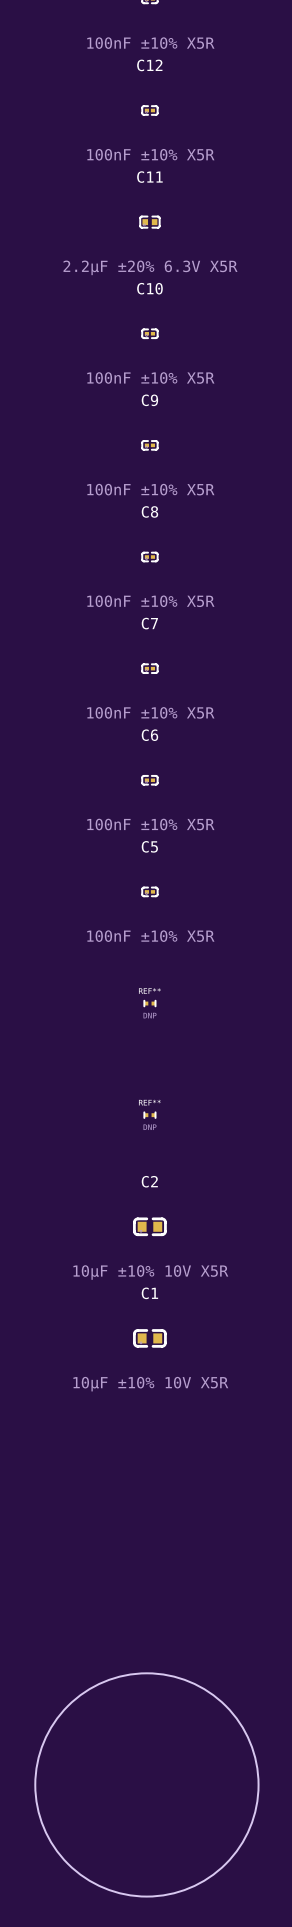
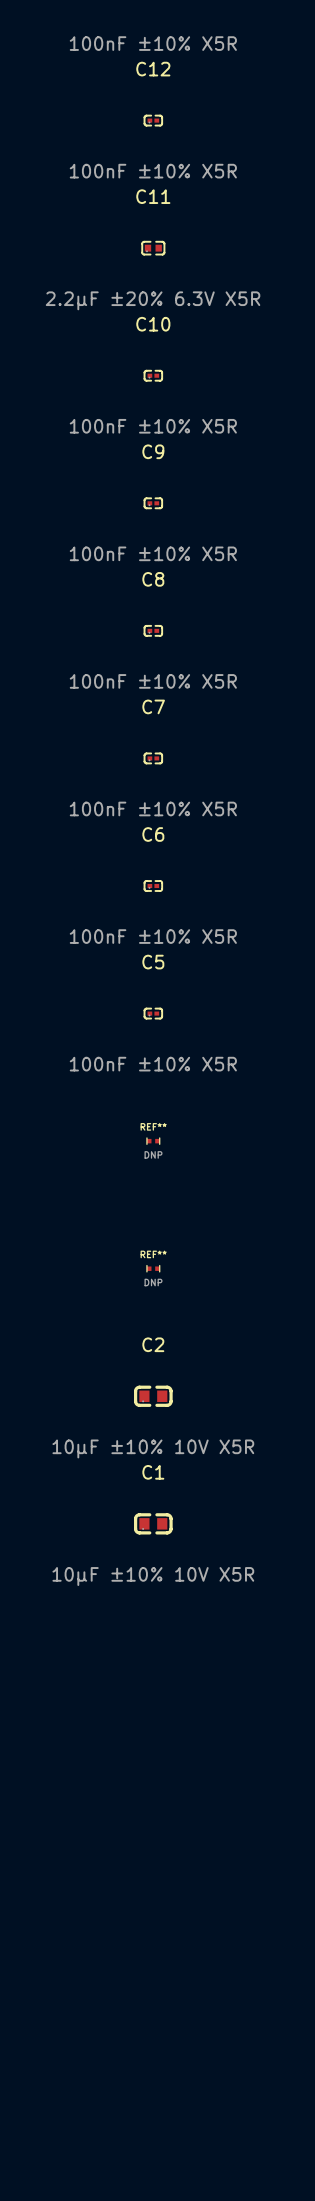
round board edge: [35, 1673, 259, 1897] -> none

